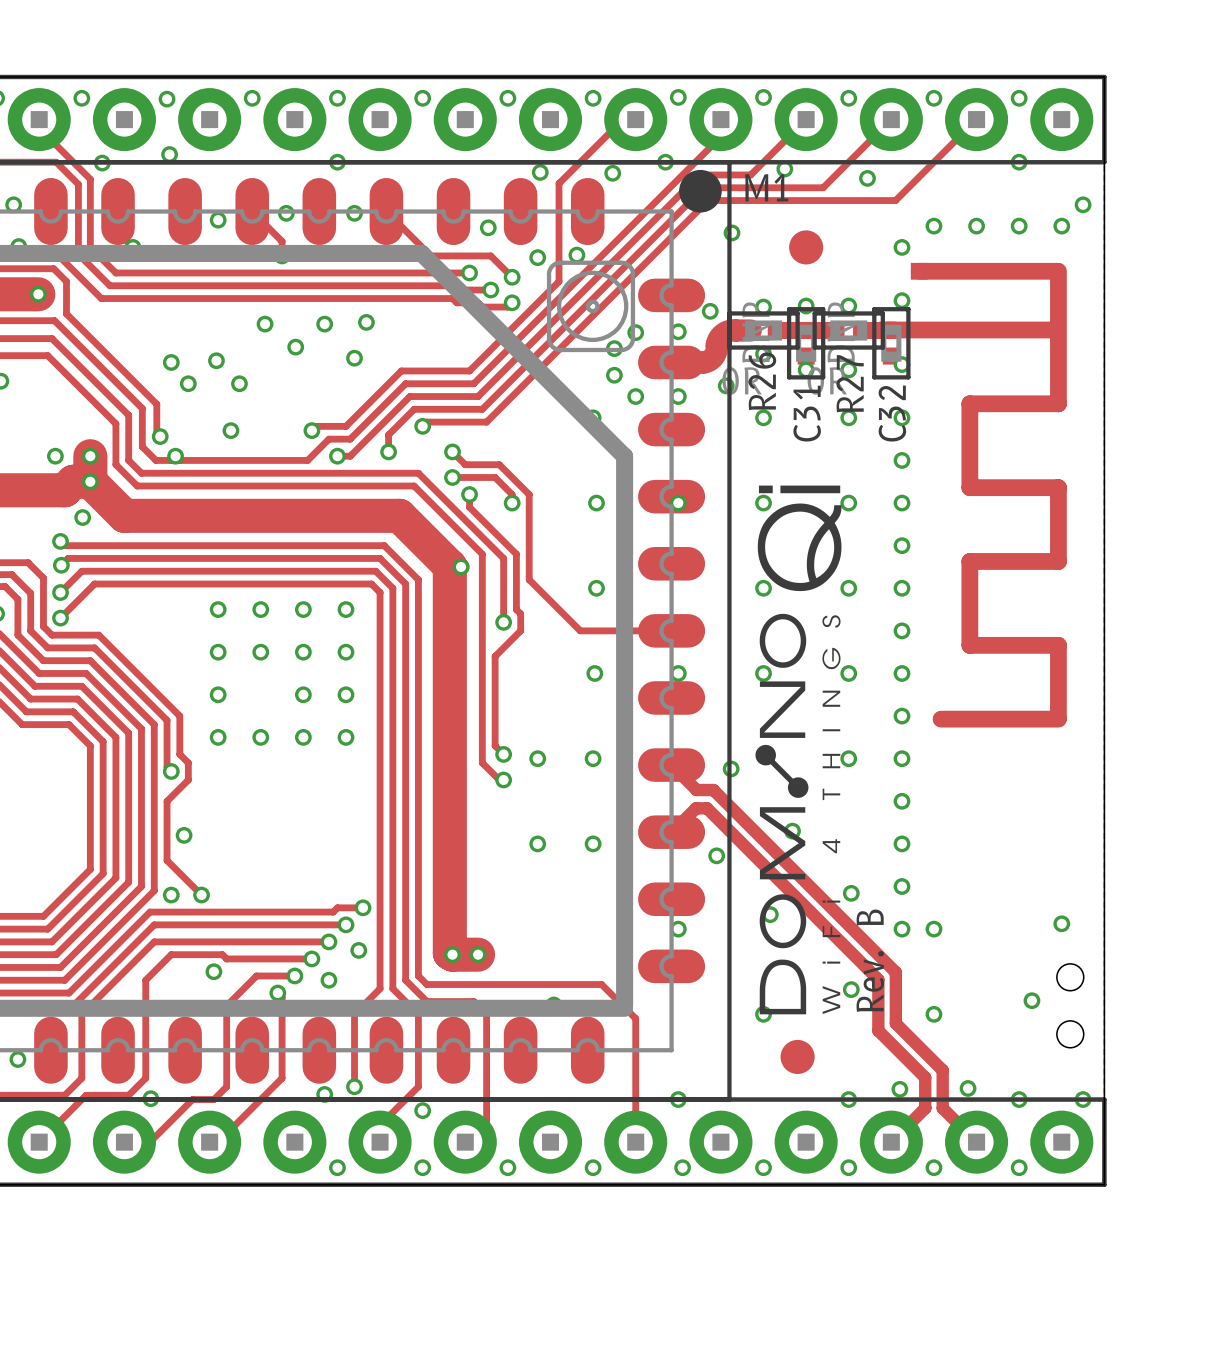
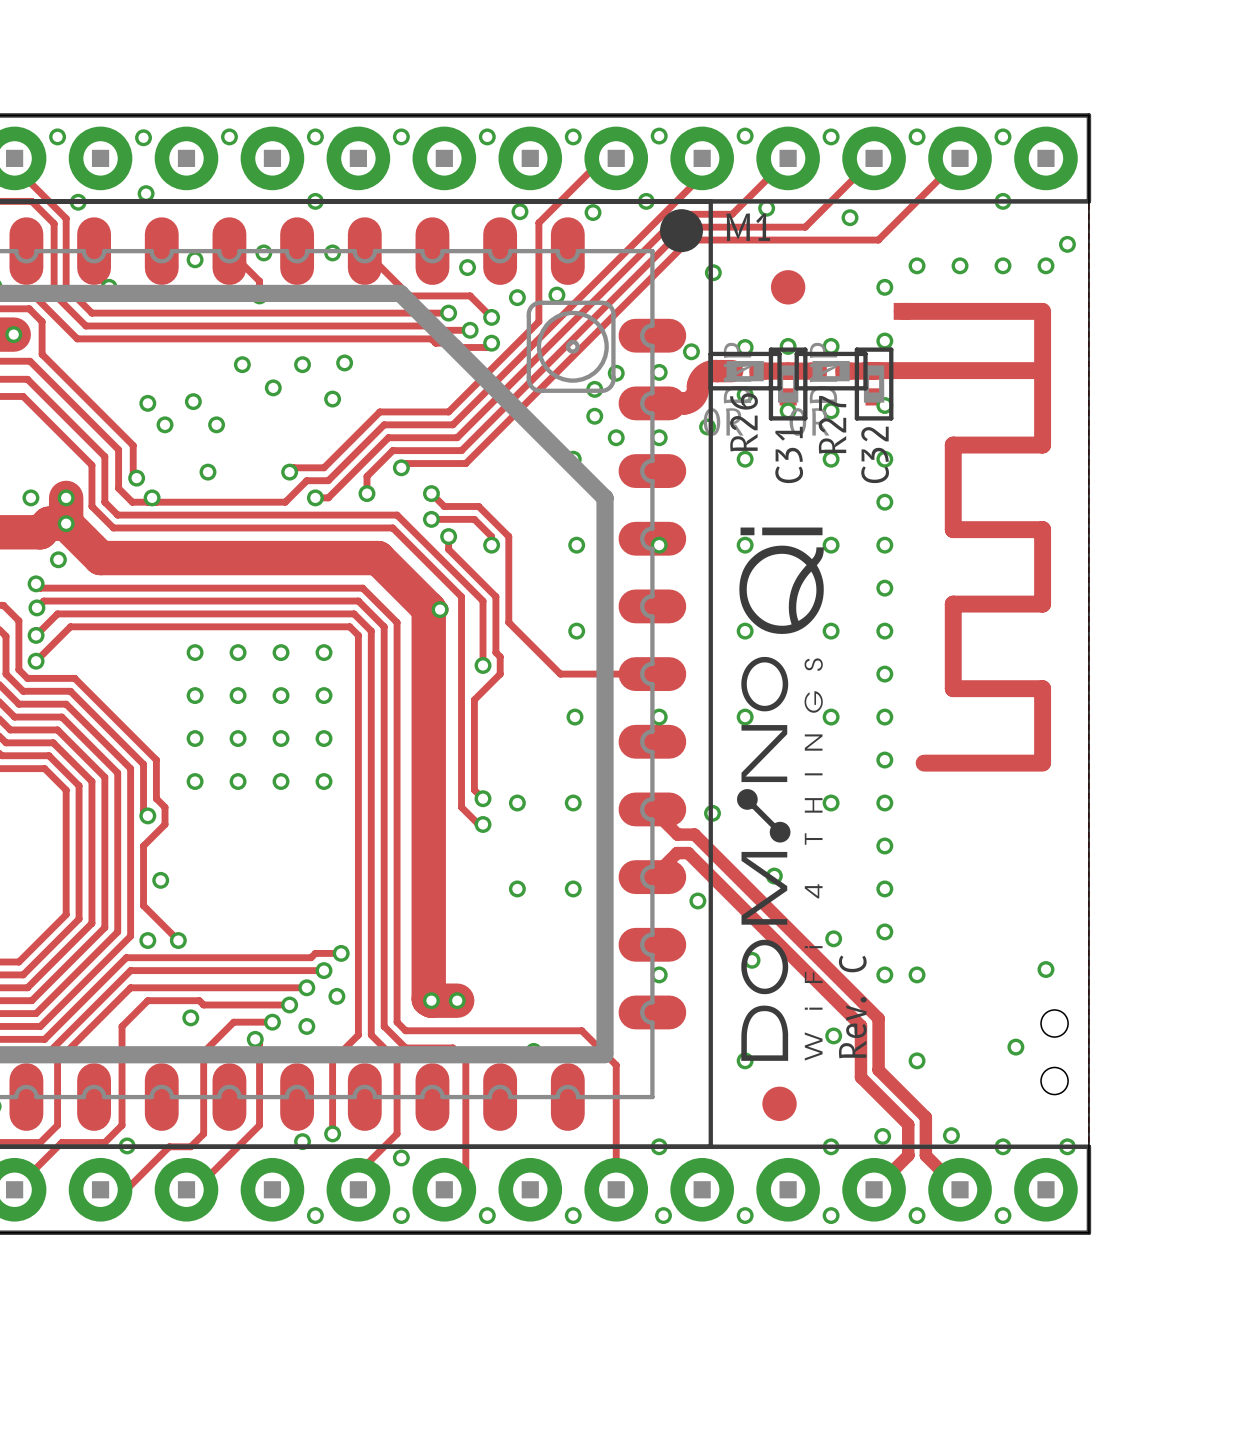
via: none -> (238, 738)
text: B (870, 917) -> C (852, 963)

